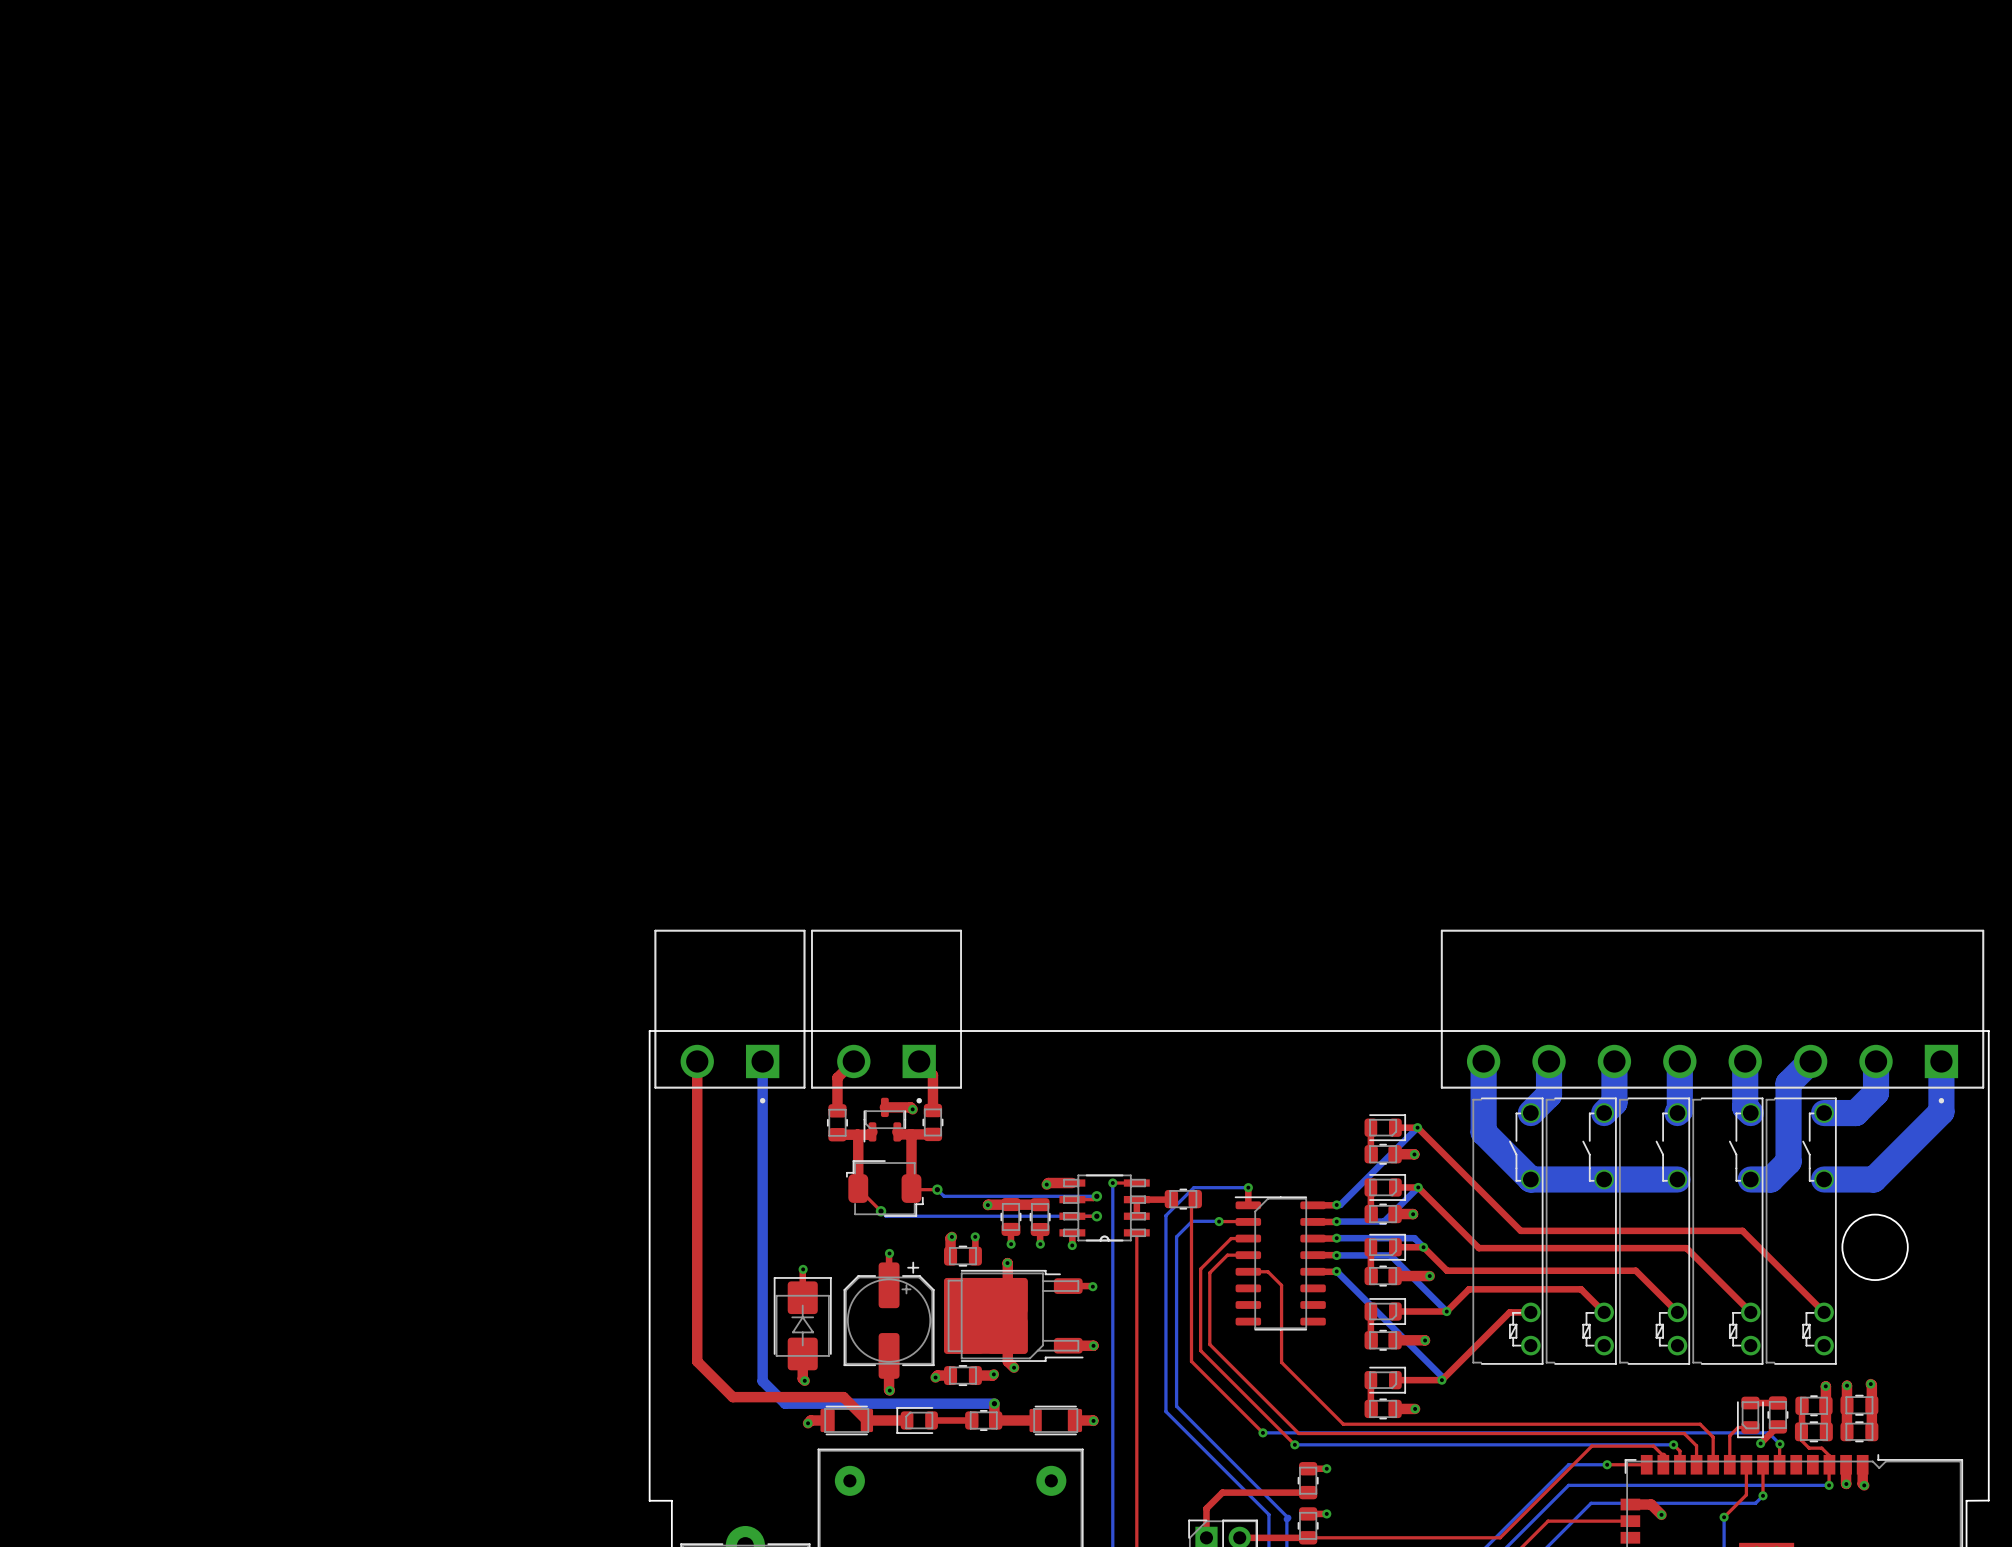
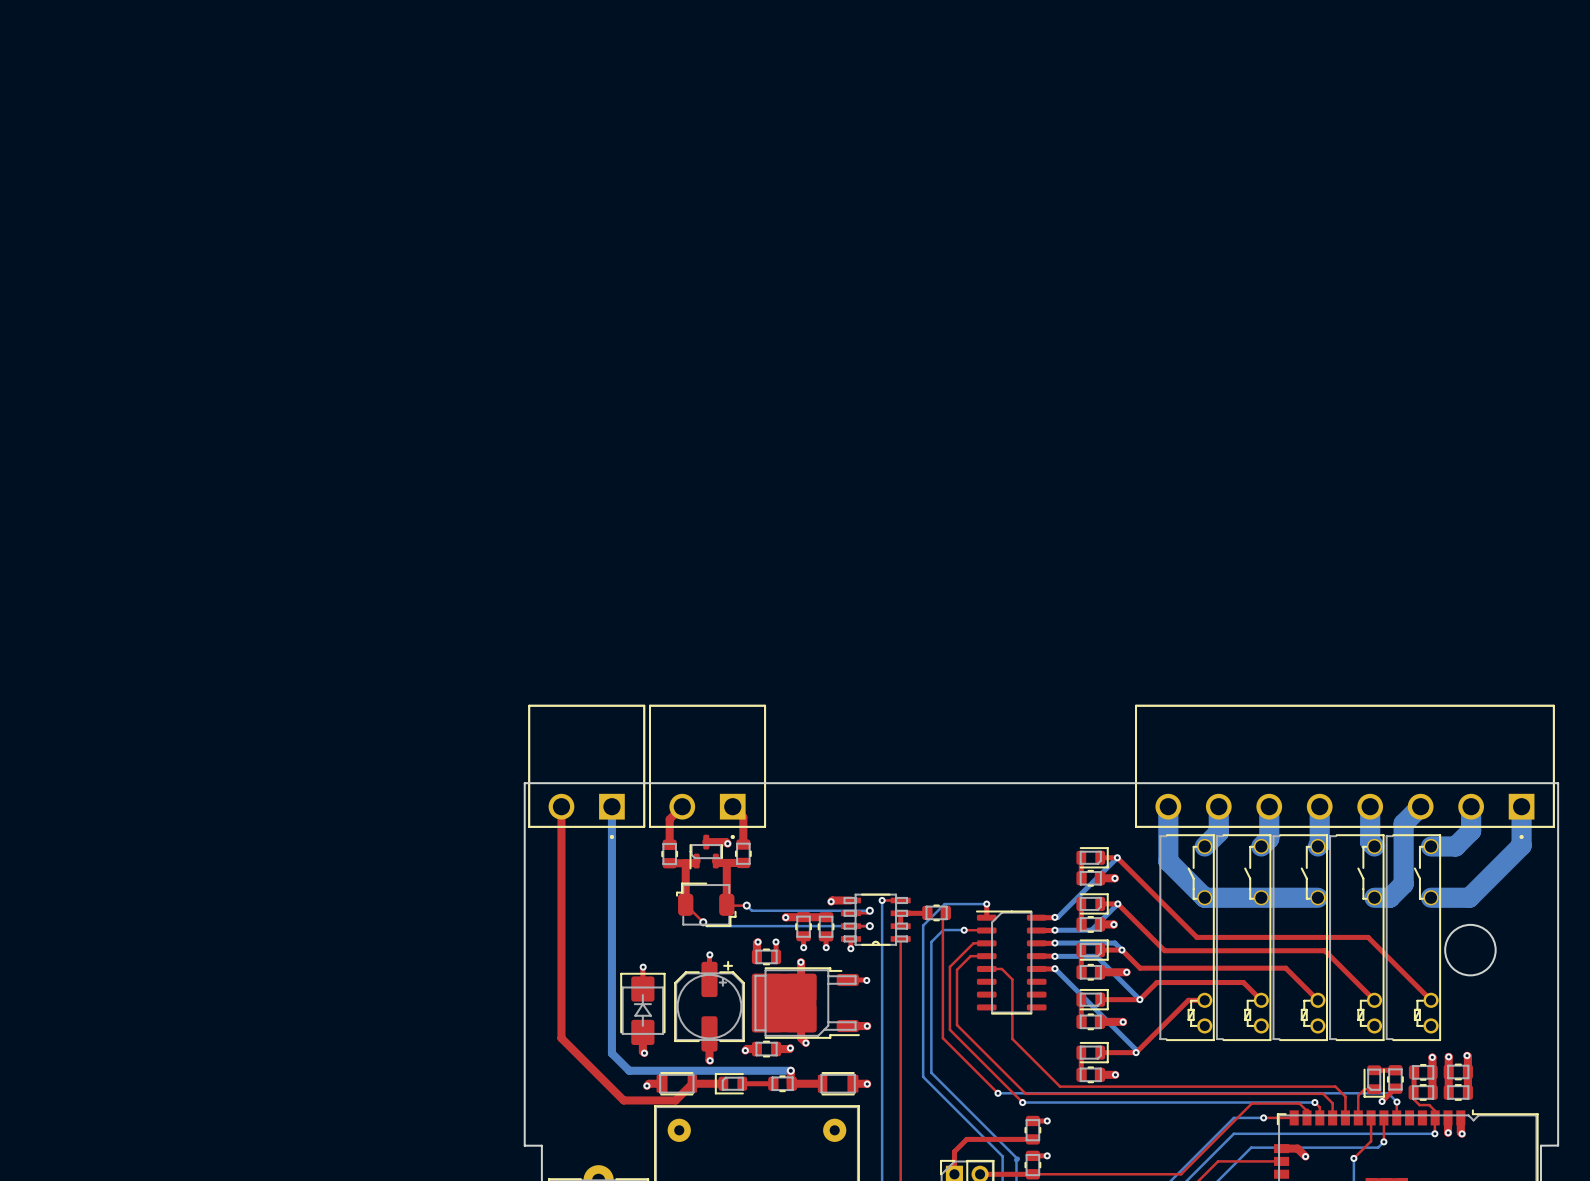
top track: (732, 1397) (843, 1397) (866, 1420) -> (588, 1065) (623, 1100) (675, 1100) (692, 1083)

